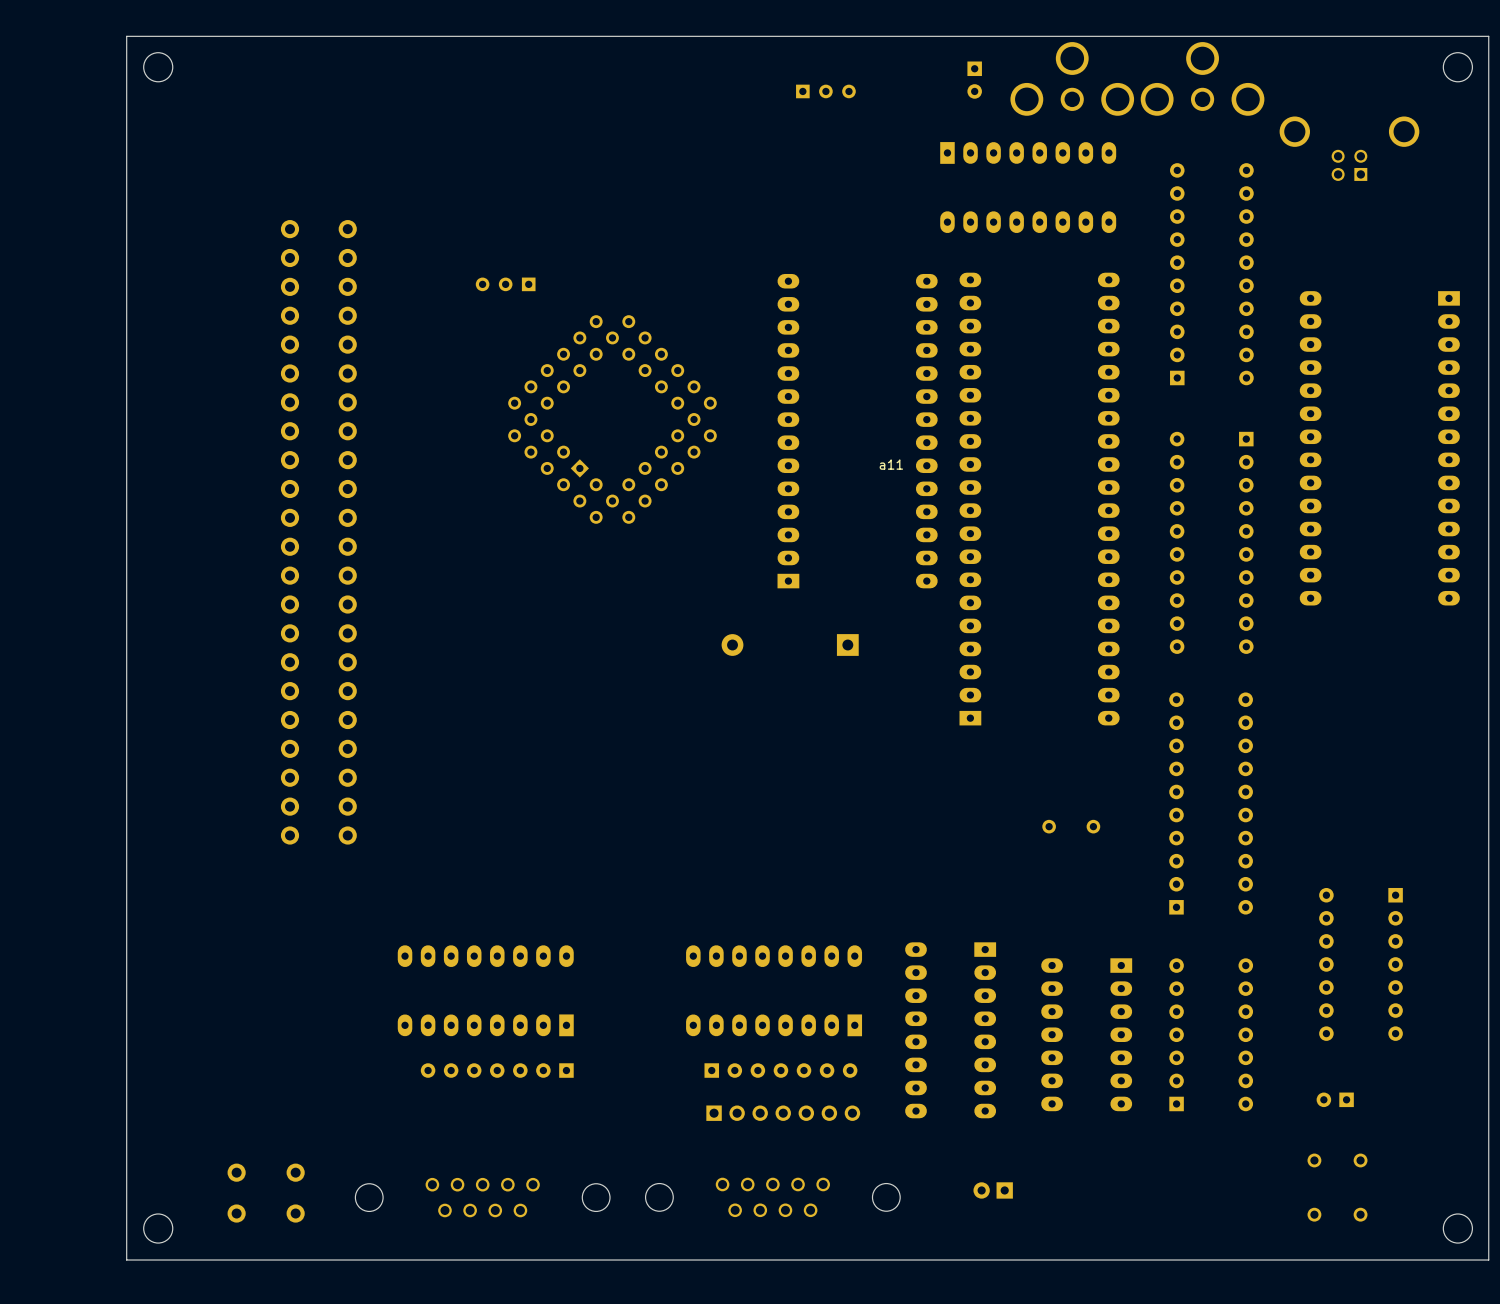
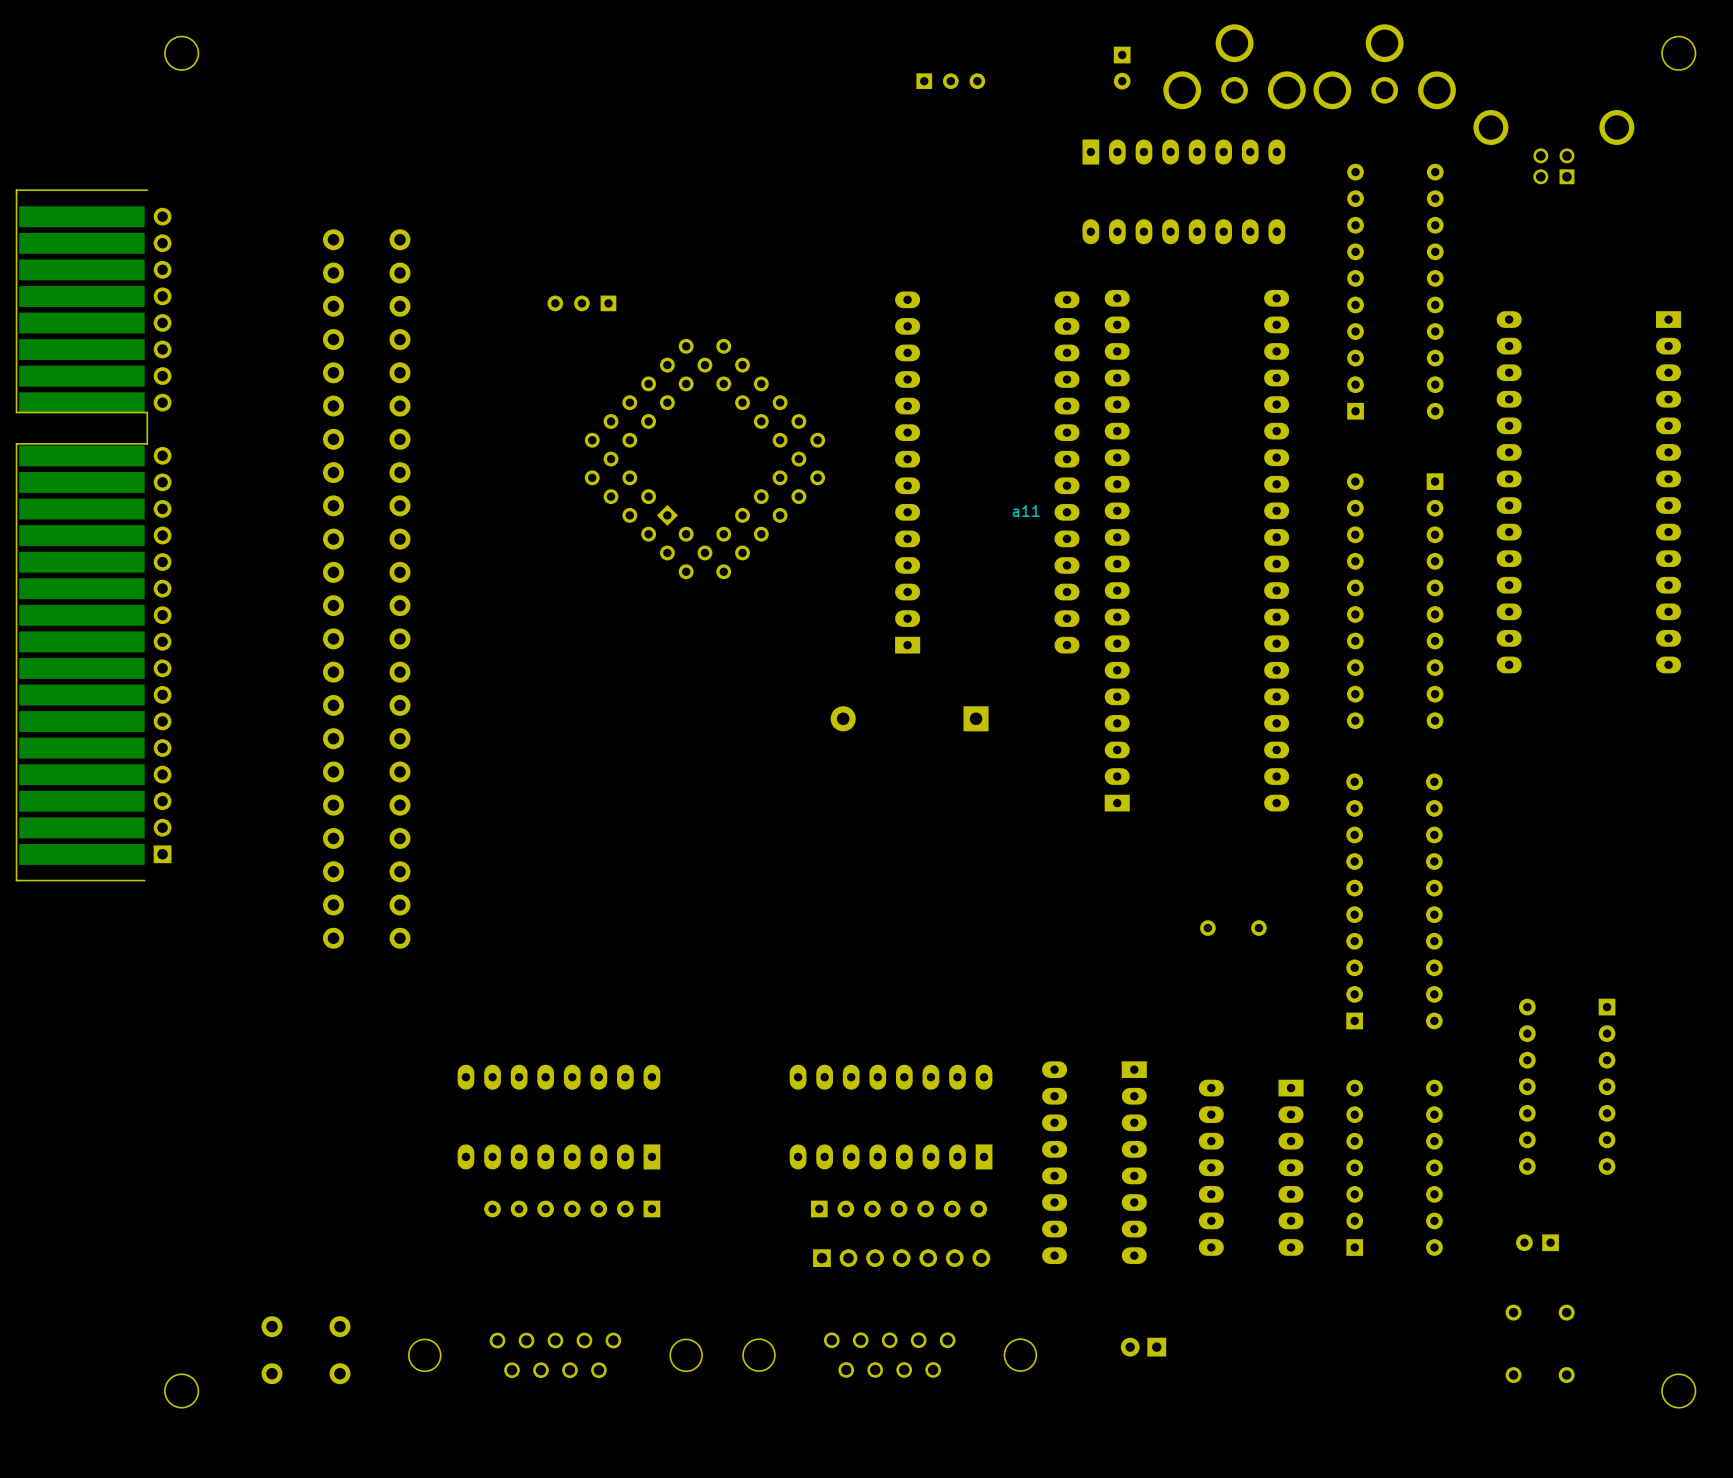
board edge: (1488, 36) (126, 36) (126, 1260) (1488, 1260) (1488, 36) -> none
part: none -> (93, 535)

